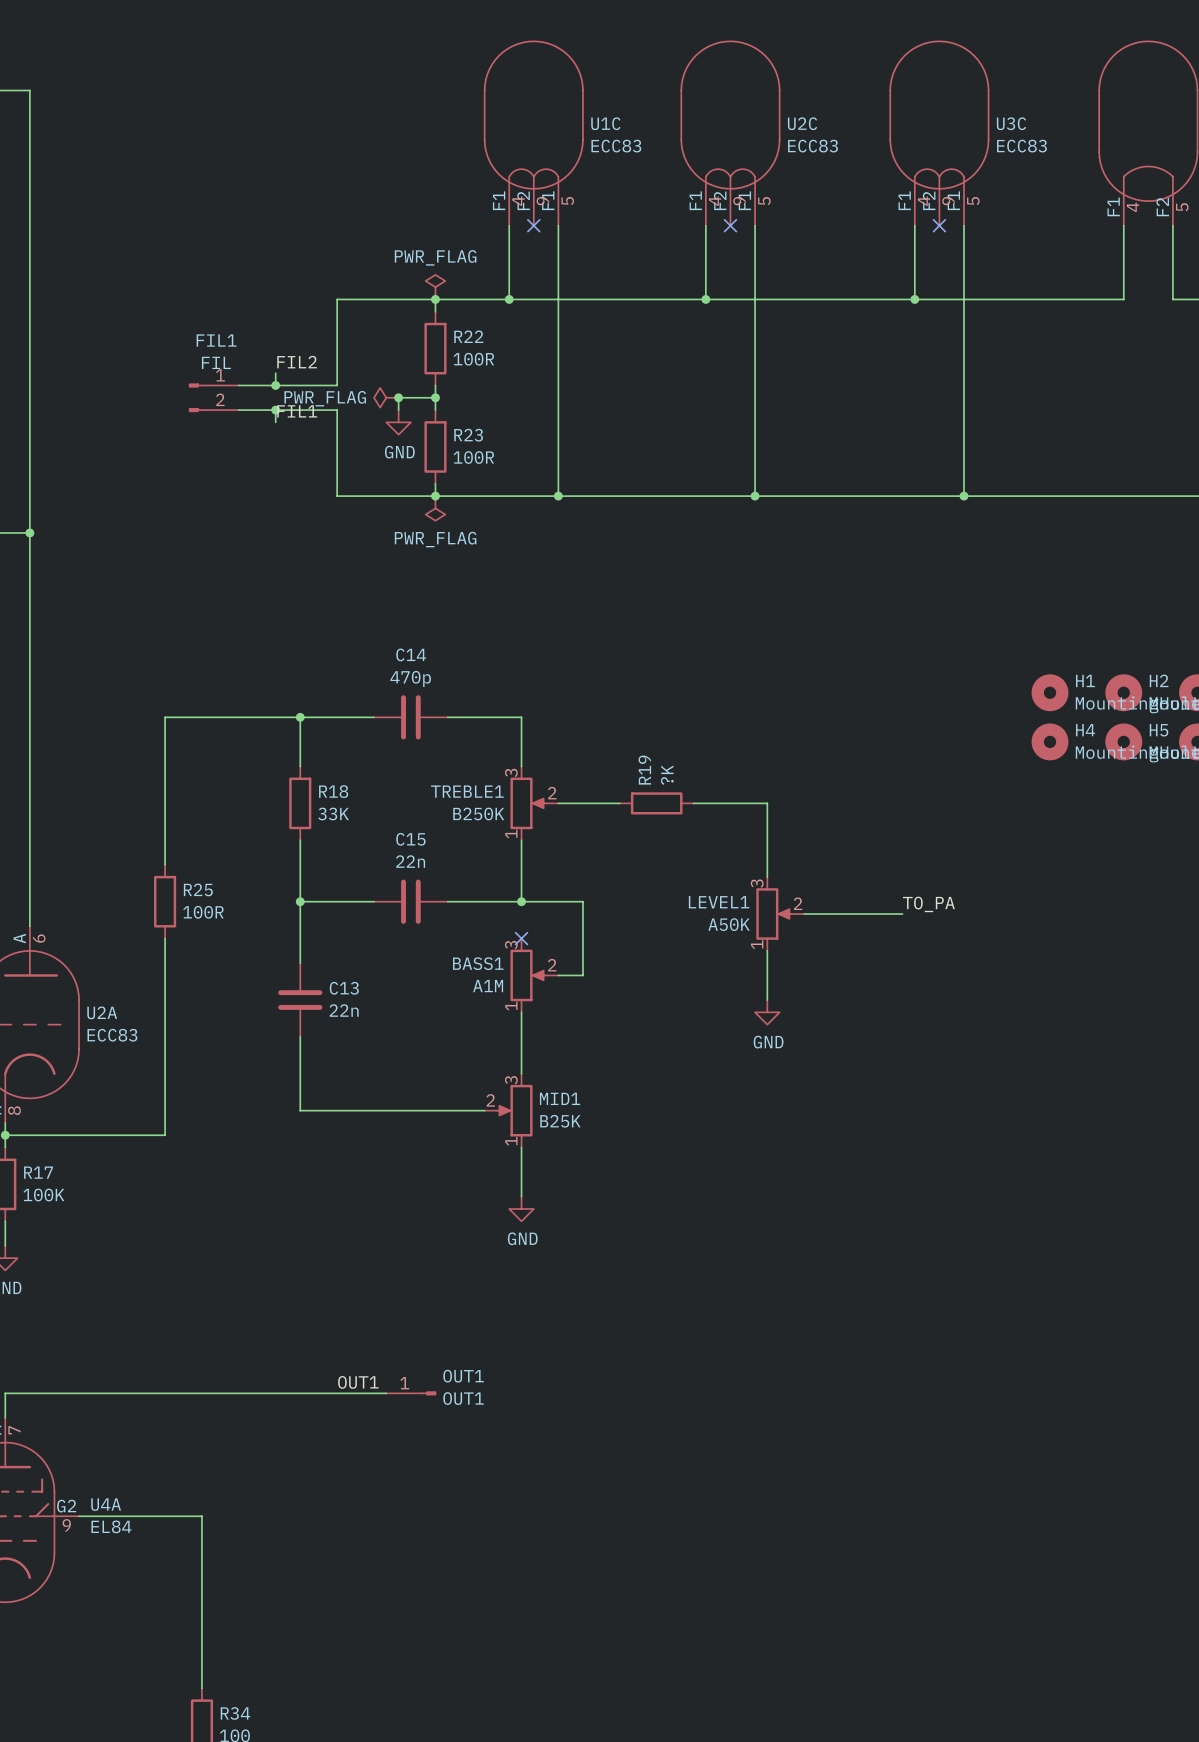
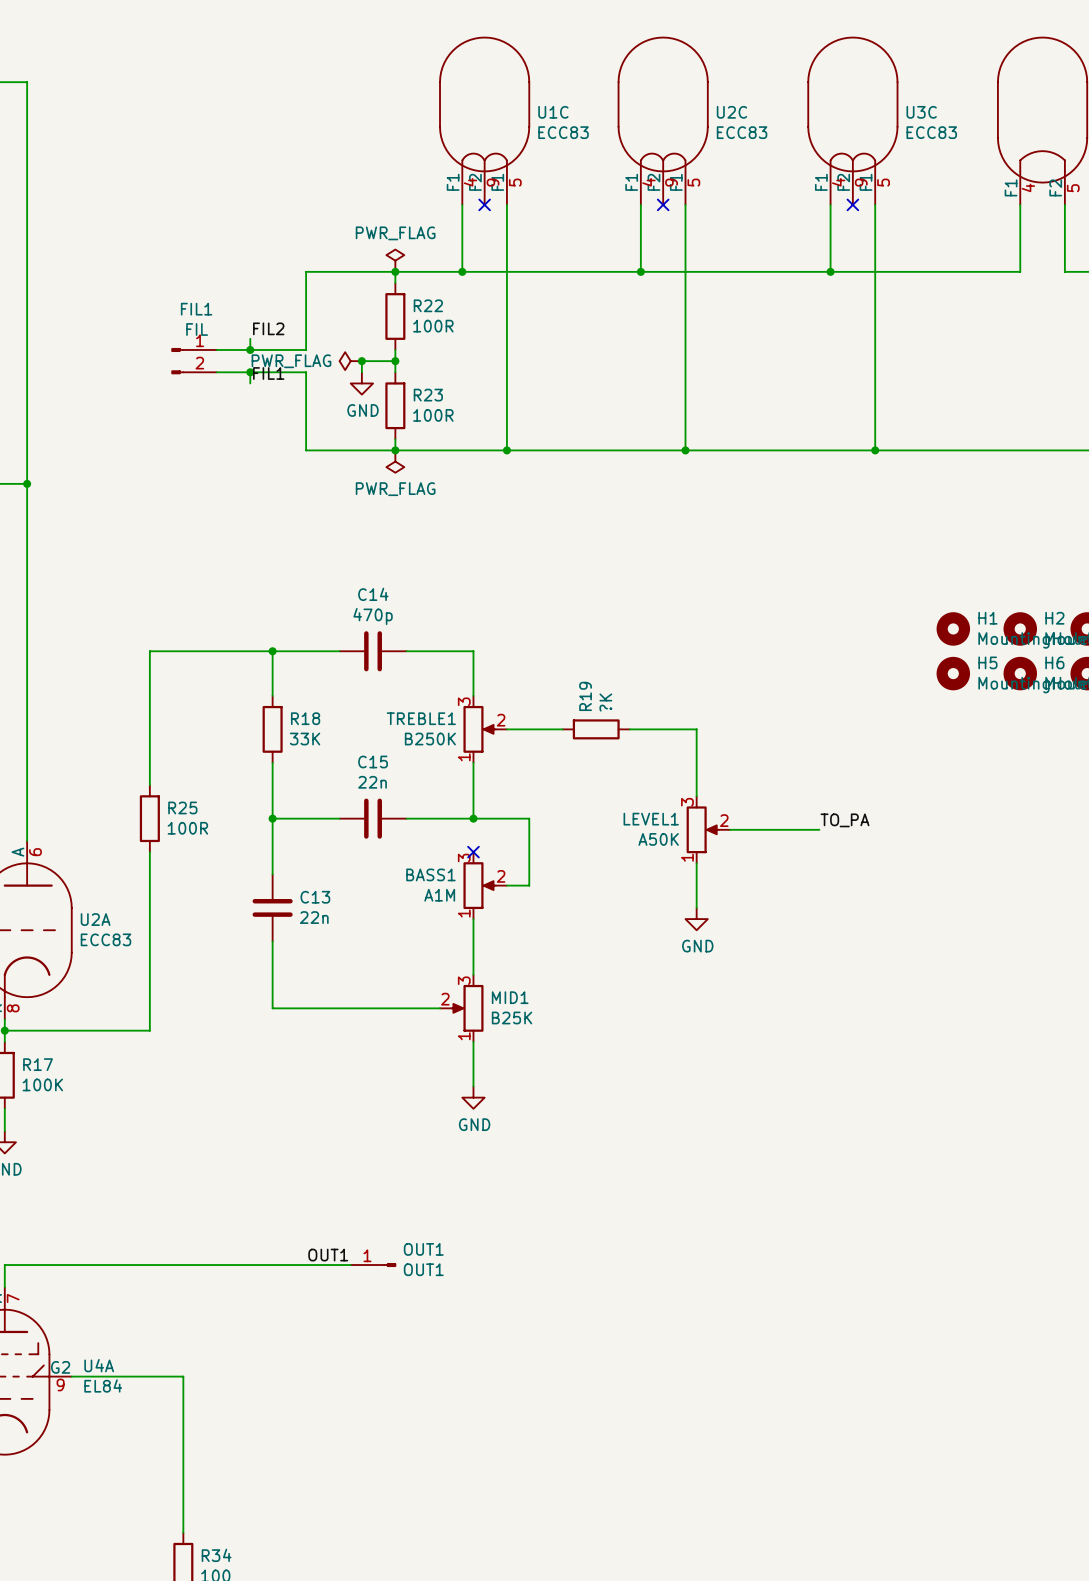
H4 name: H4 (1085, 730) -> H5 (987, 662)
H5 name: H5 (1159, 730) -> H6 (1054, 662)

